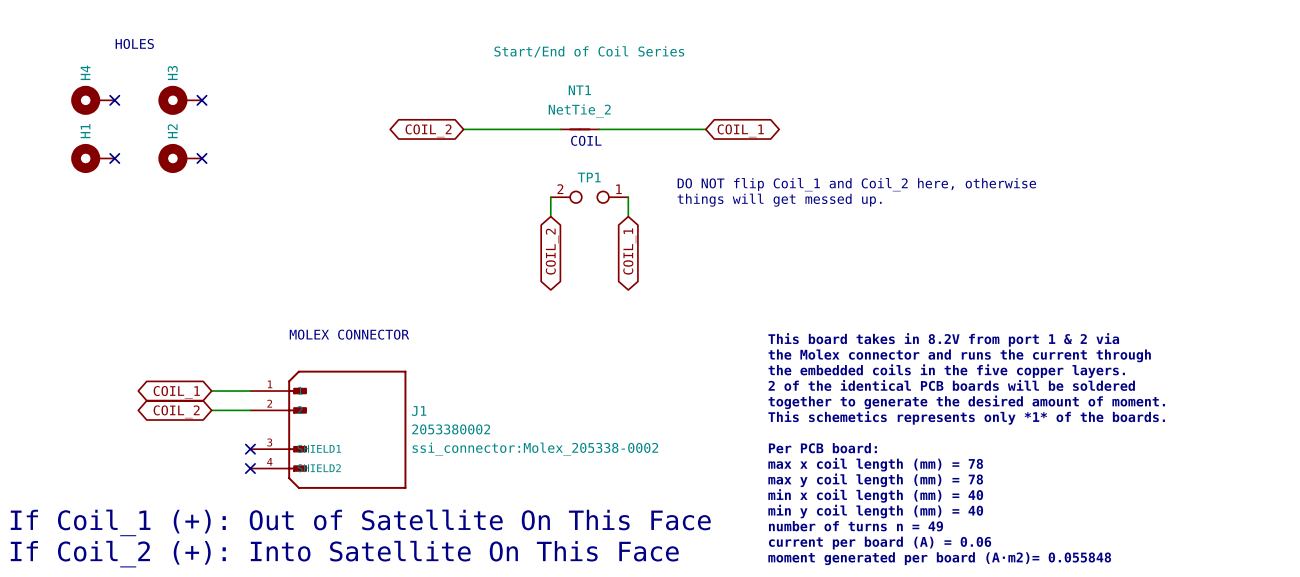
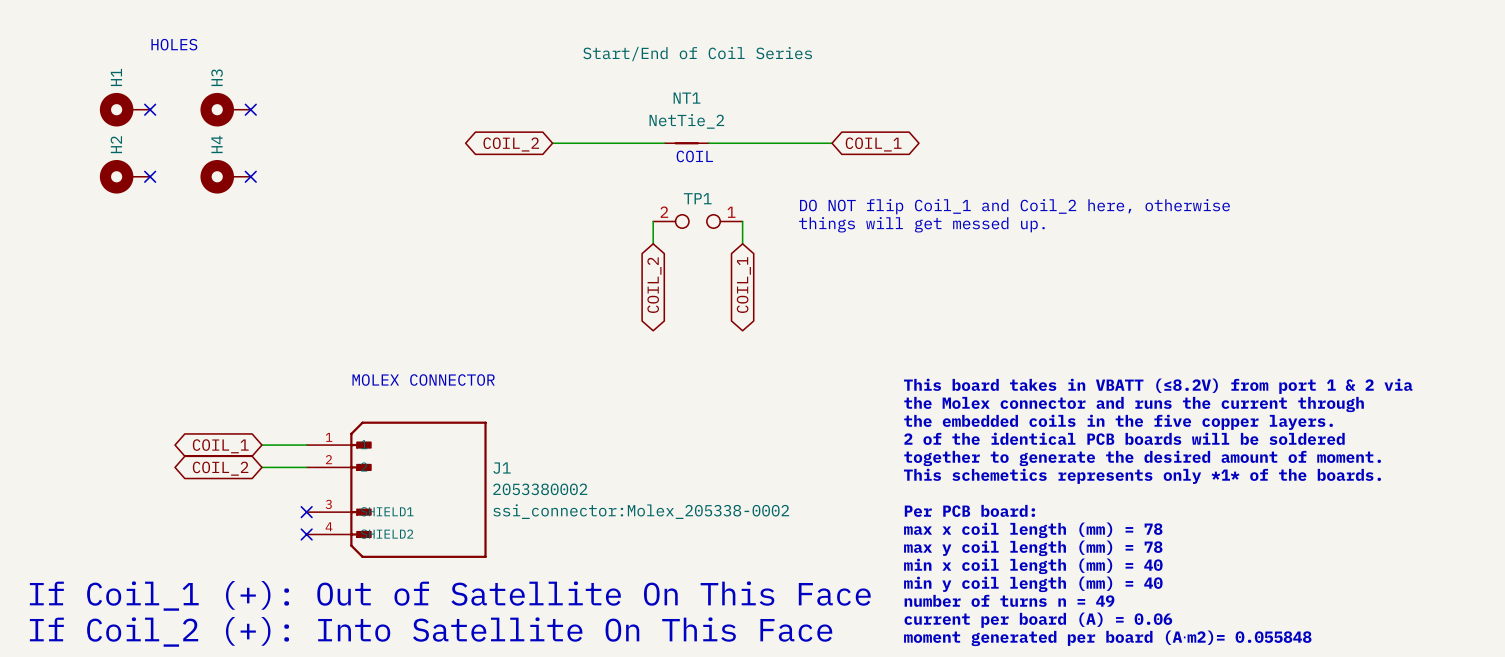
H4 name: H4 (85, 72) -> H1 (116, 77)
H1 name: H1 (85, 131) -> H2 (116, 144)
H2 name: H2 (172, 131) -> H4 (217, 144)
text: This board takes in 8.2V from port 1 & 2 via (943, 339) -> This board takes in VBATT (≤8.2V) from port 1 & 2 via (1158, 386)

